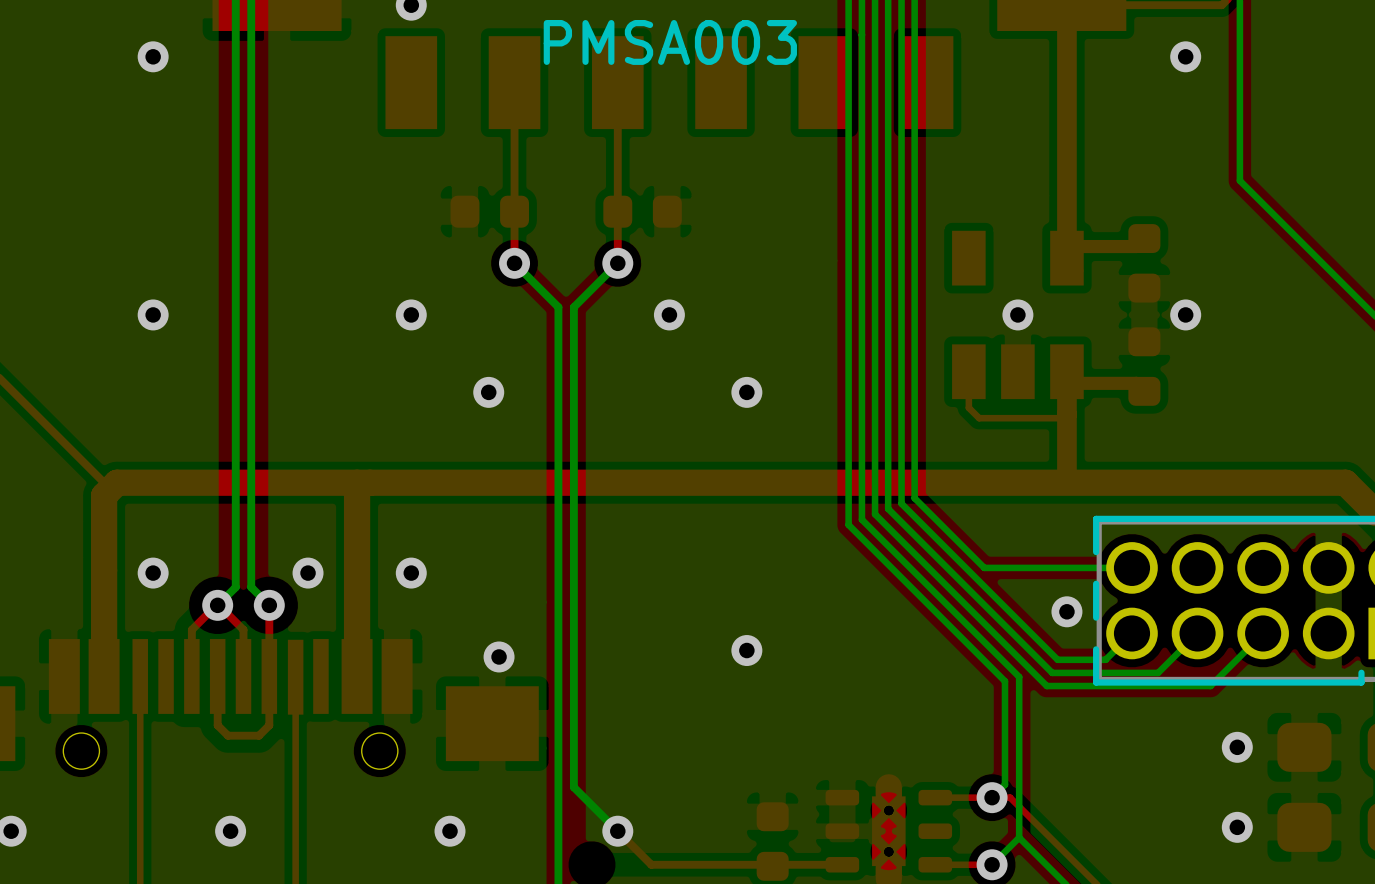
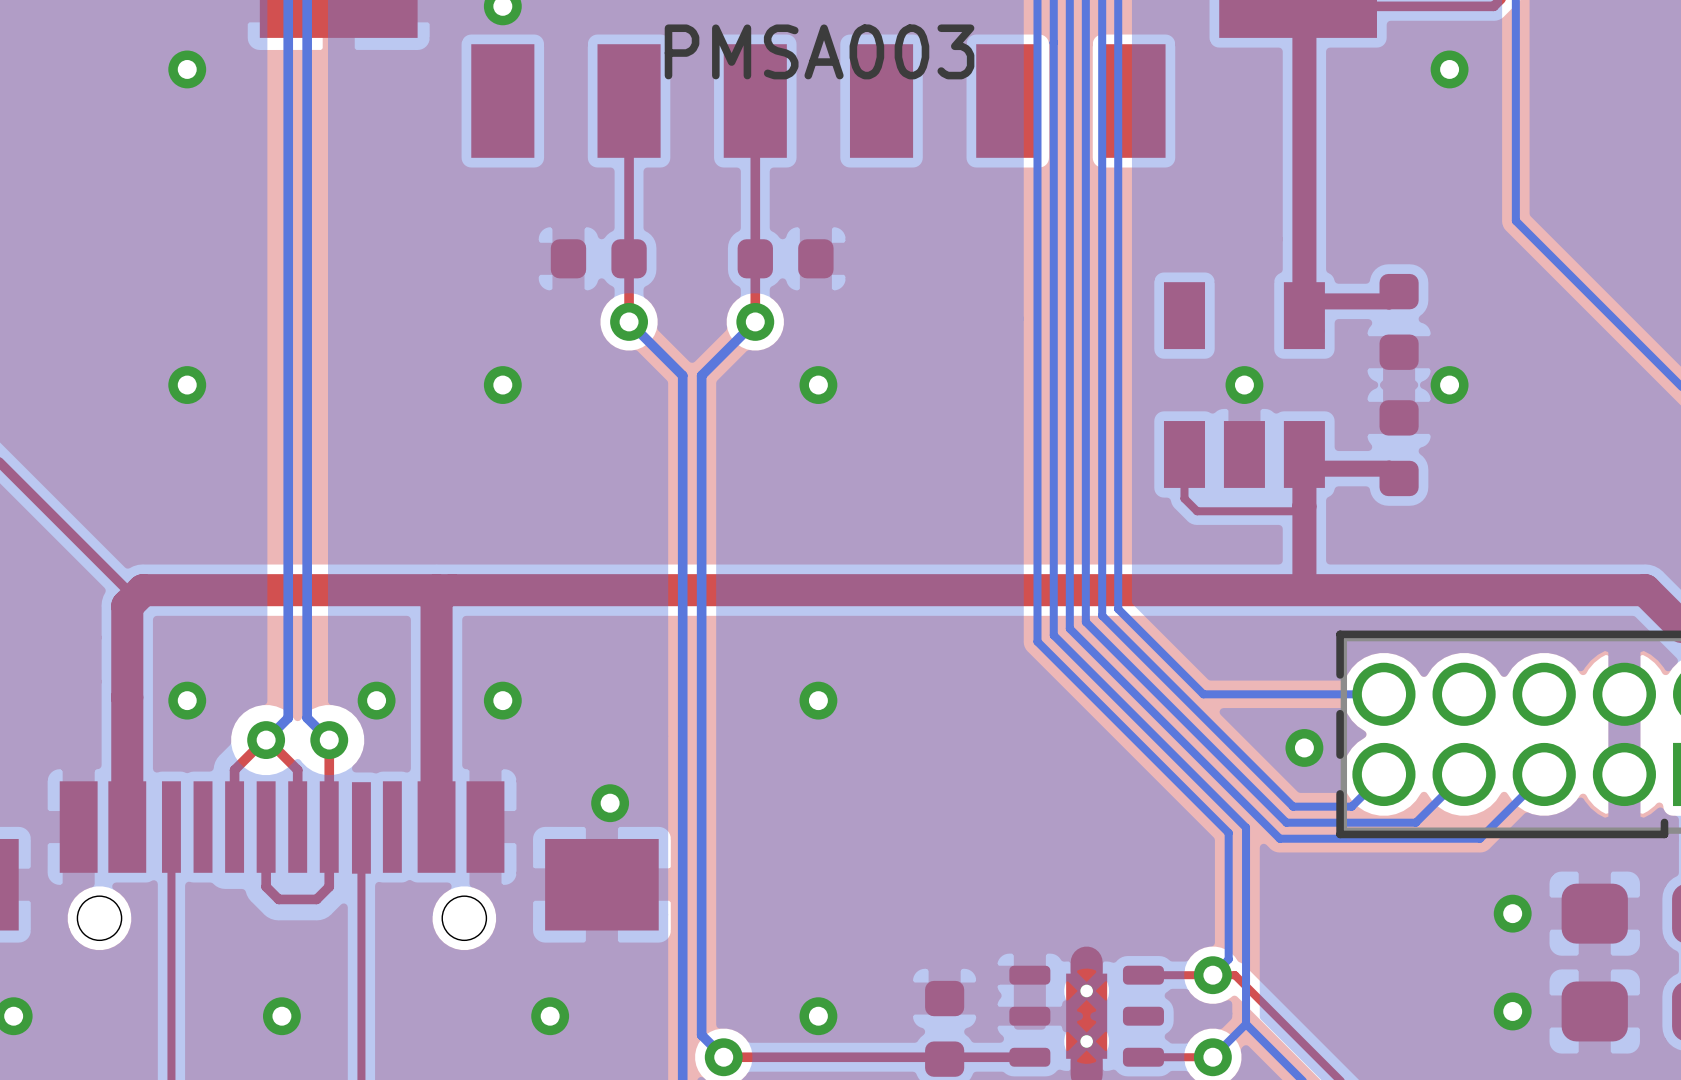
via: (488, 392) -> none
via: (746, 392) -> none
via: none -> (818, 700)
via: (746, 650) -> none
bottom track: (573, 787) (617, 831) -> (701, 962) (701, 1035) (723, 1057)
top track: (617, 831) (651, 864) -> (723, 1057) (796, 1057)
via: (617, 831) -> none
via: none -> (818, 1016)
via: none -> (723, 1057)

